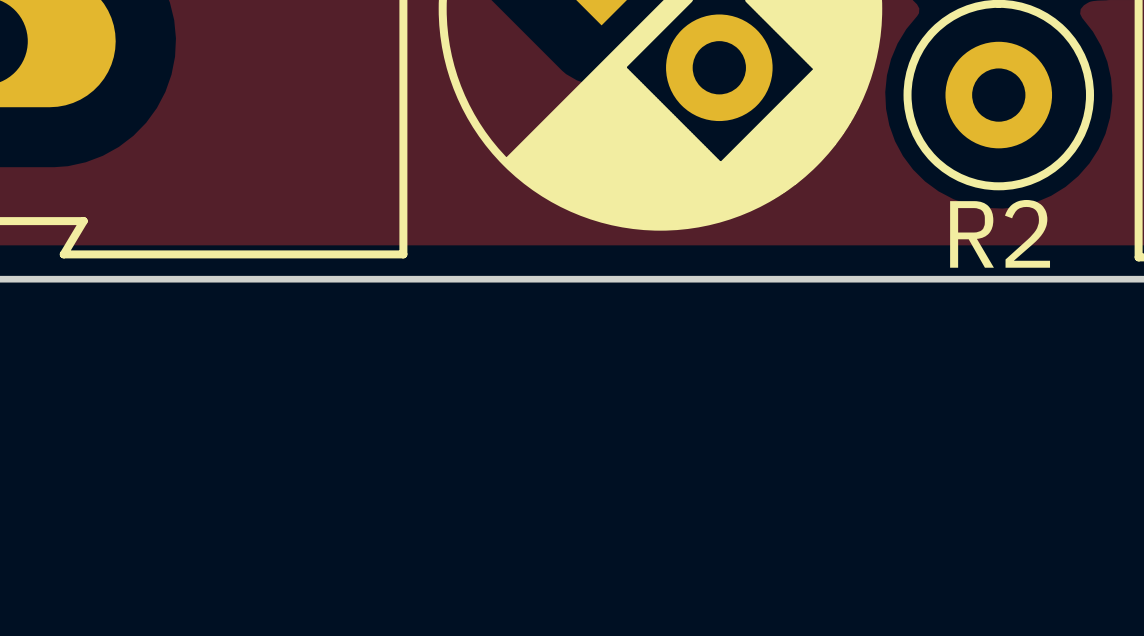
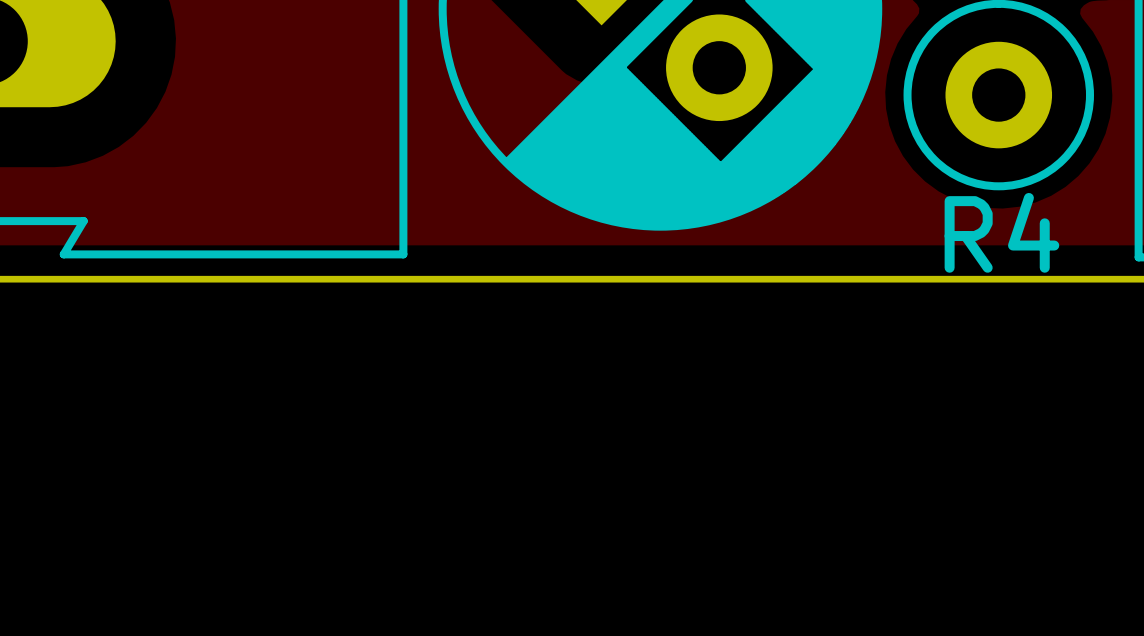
R2 name: R2 (1000, 233) -> R4 (1001, 232)

